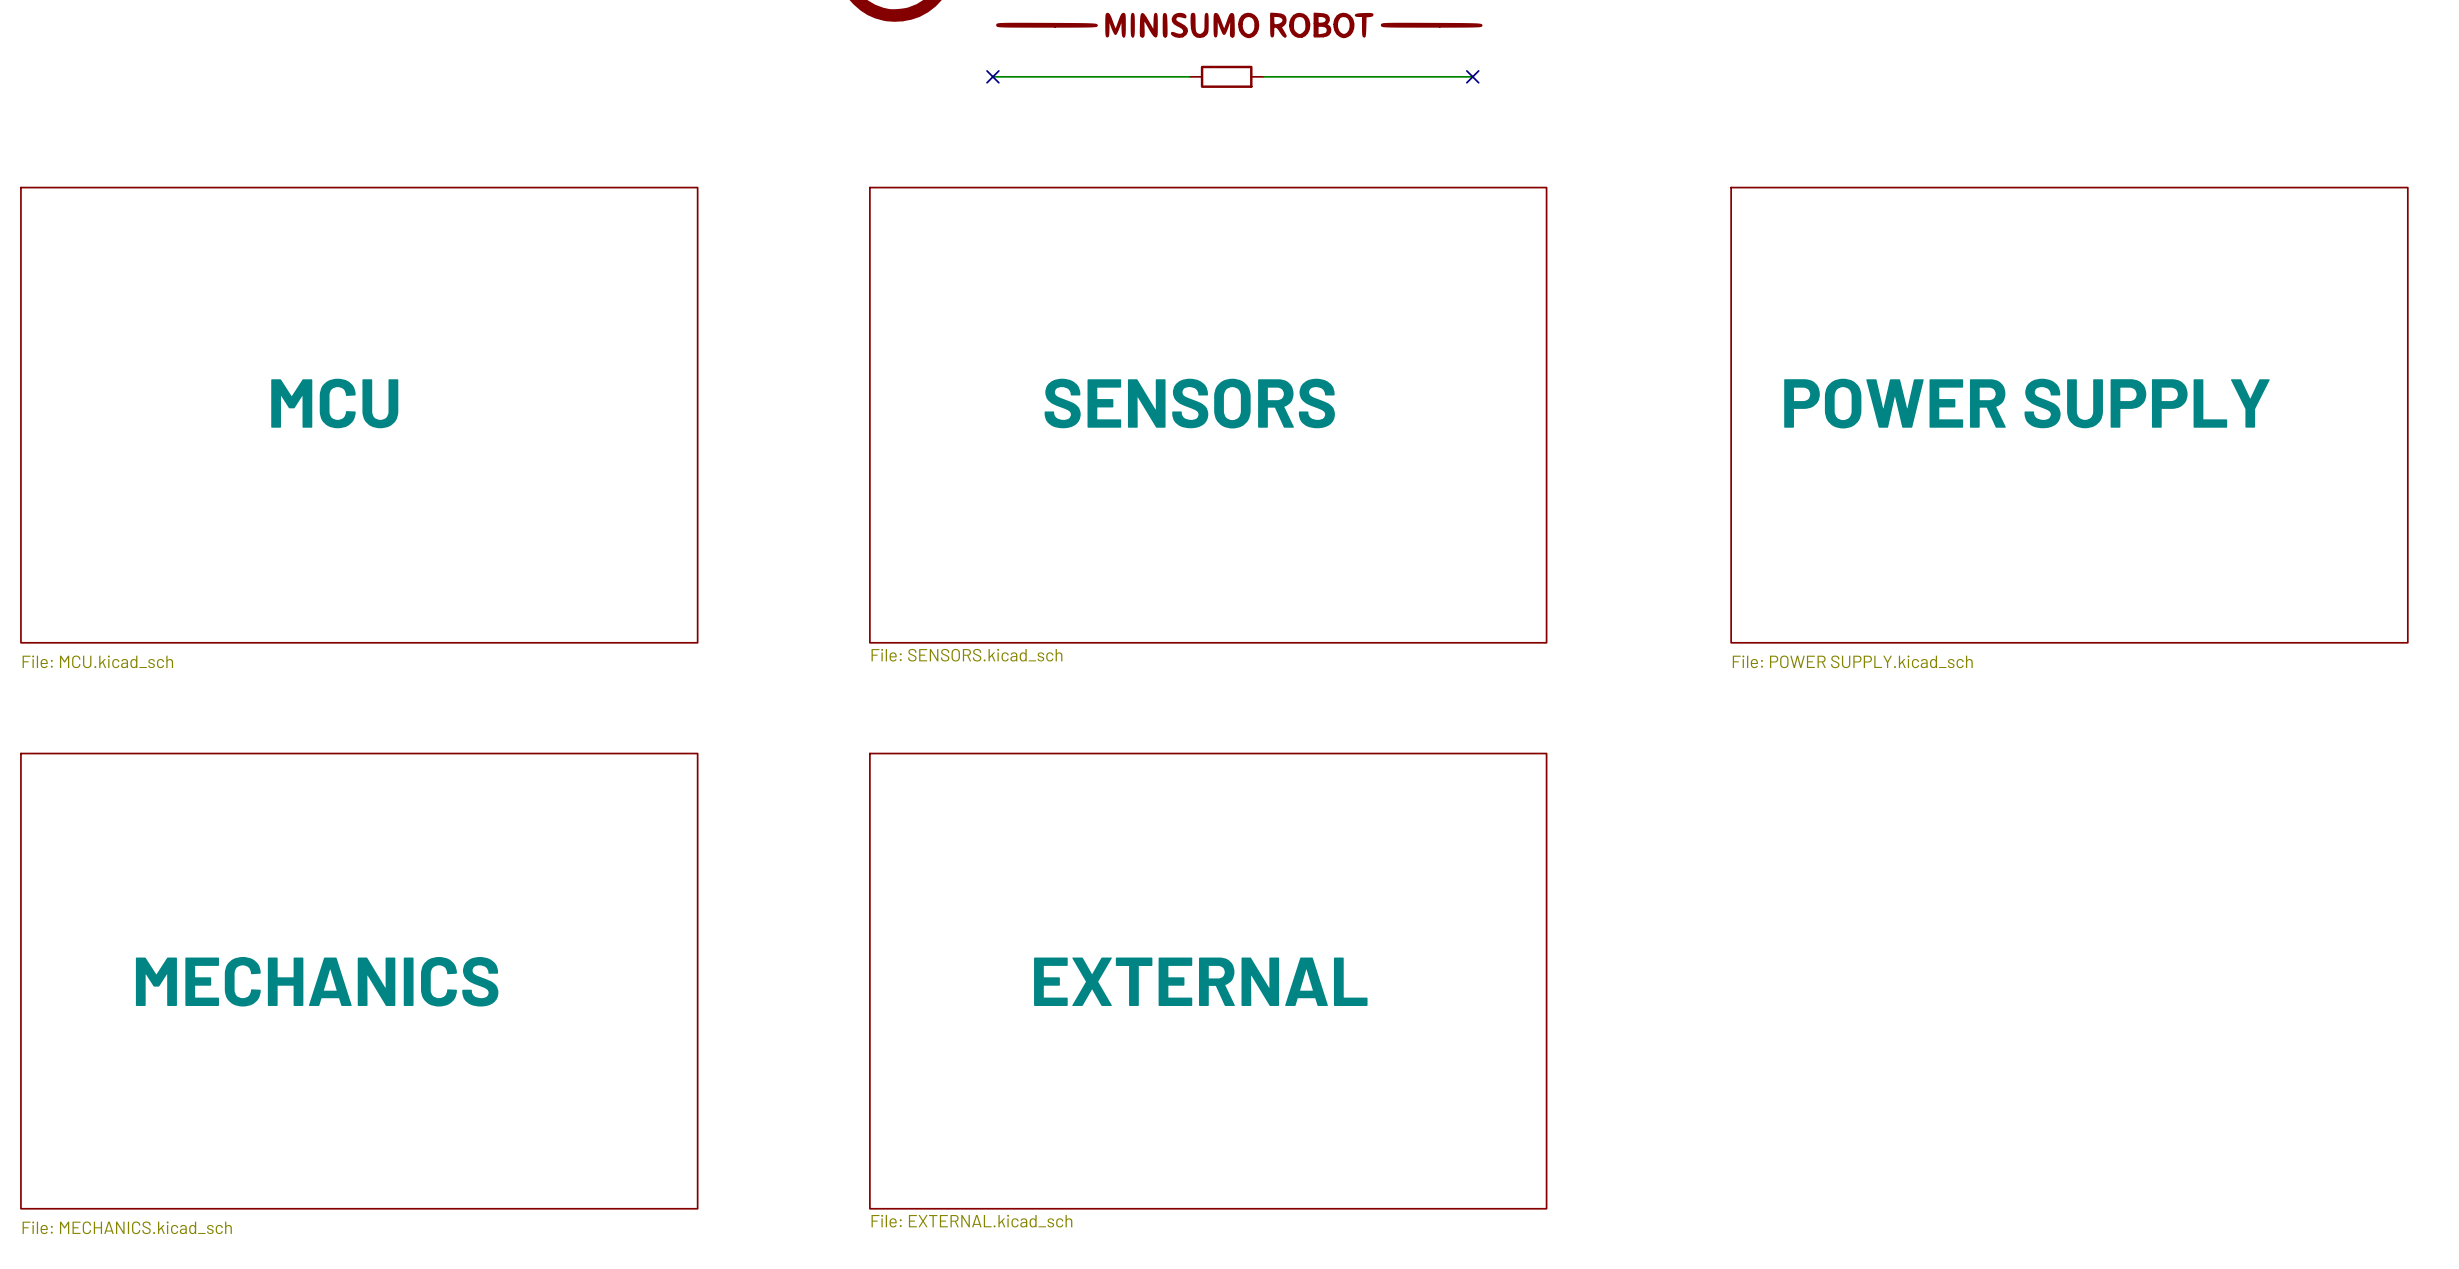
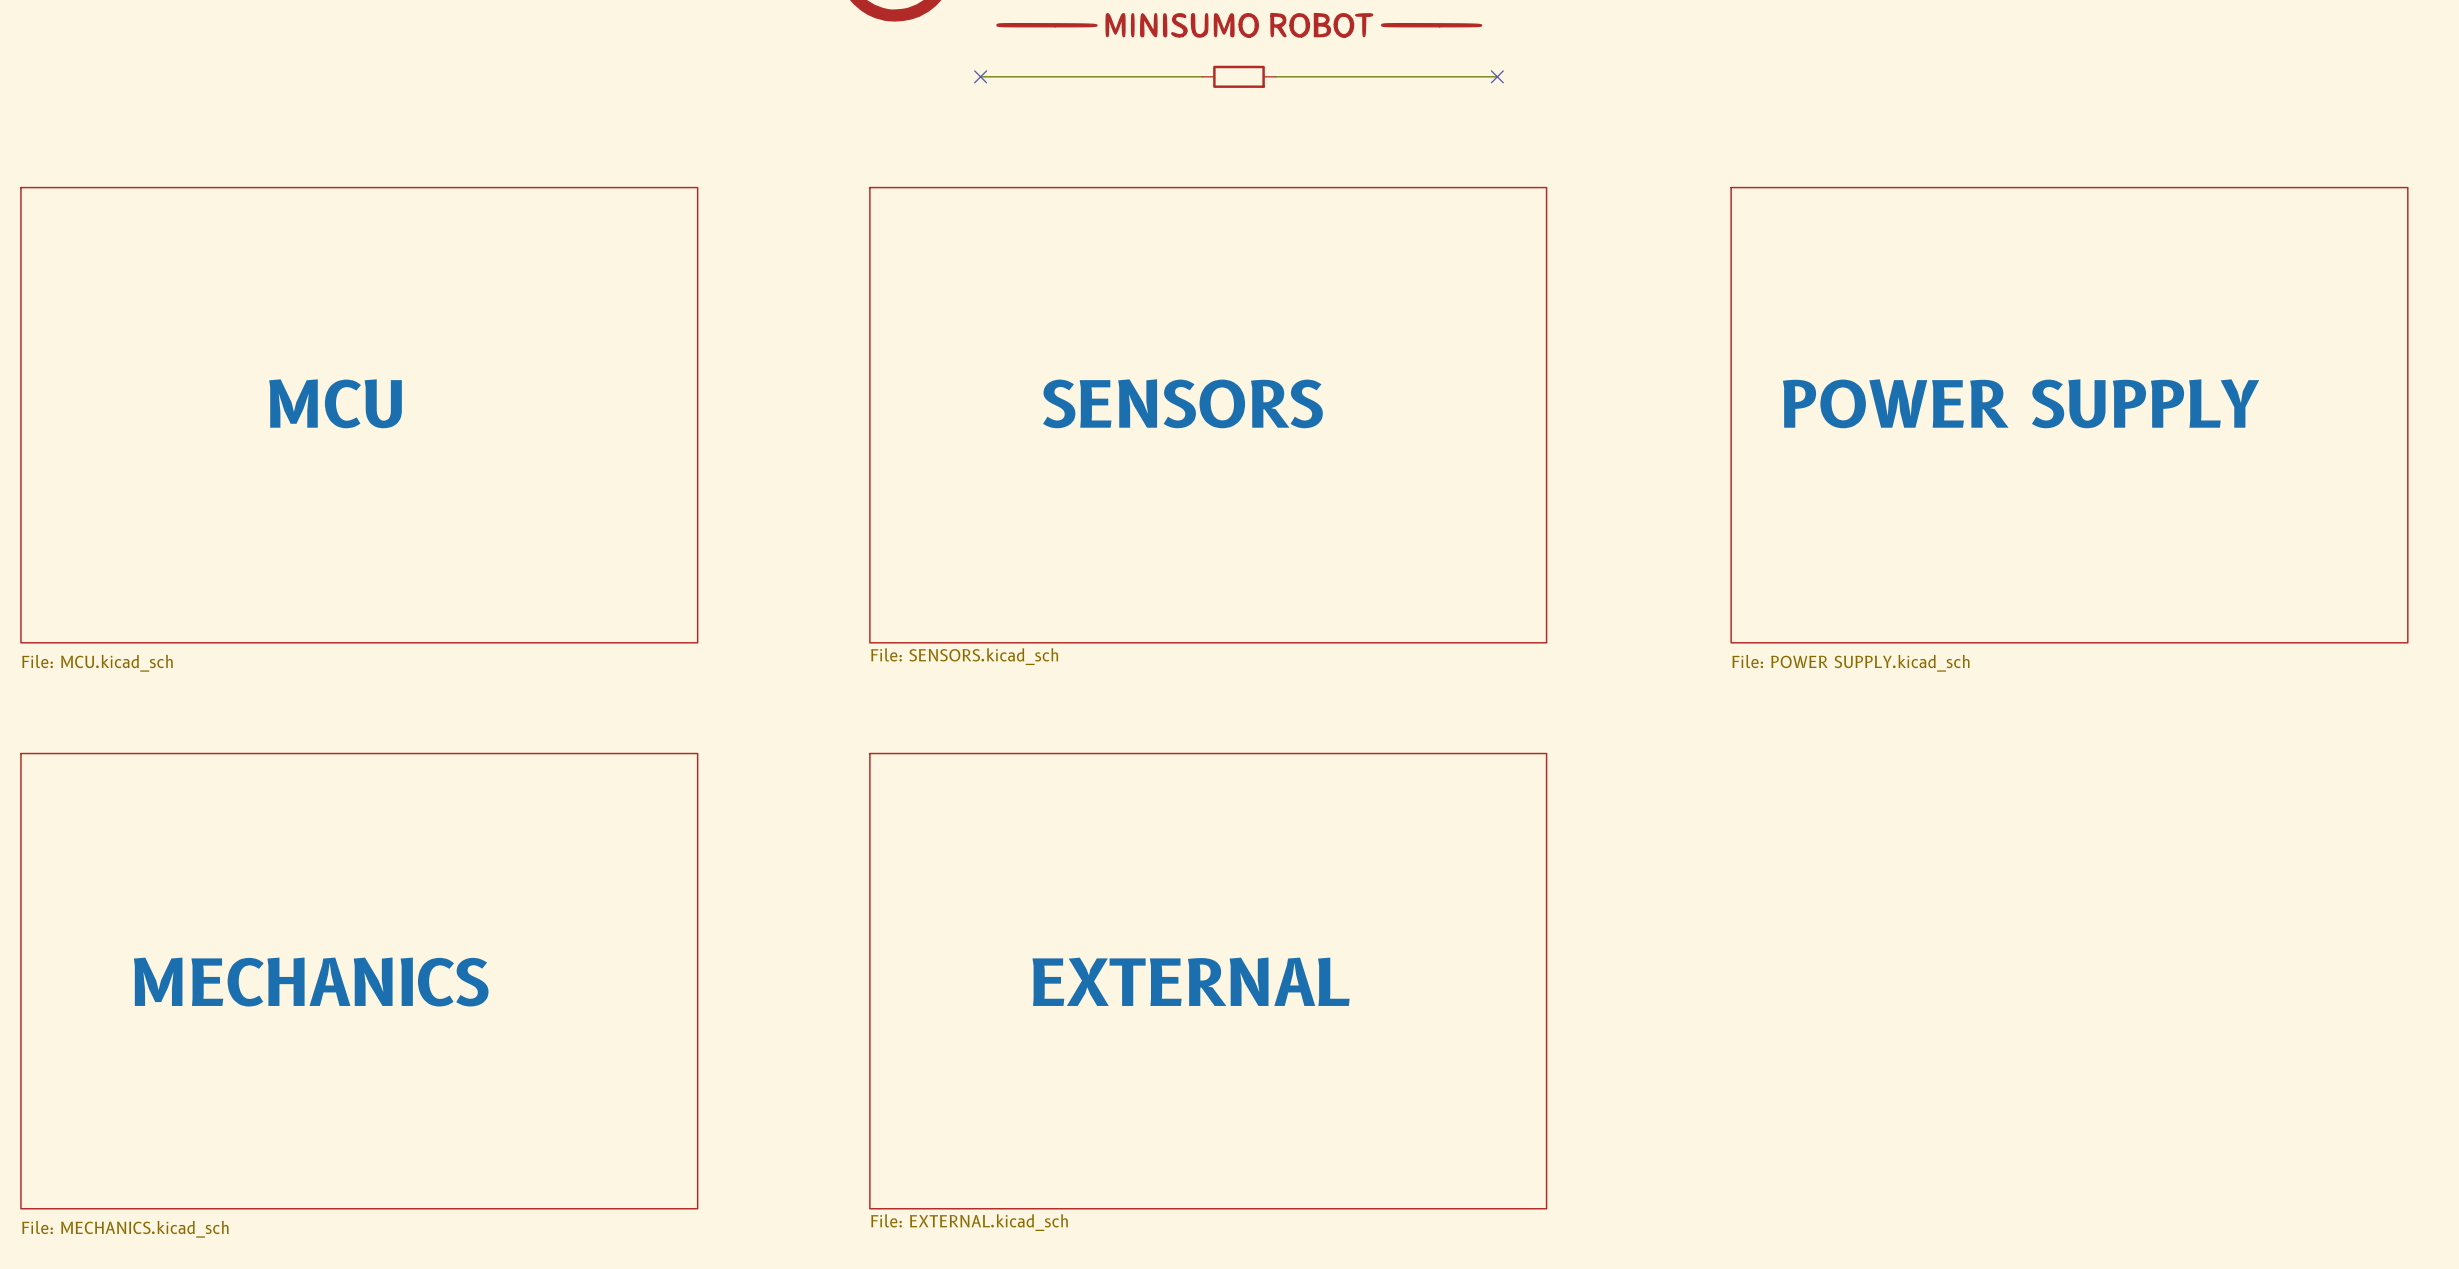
wire: none -> (980, 76) (992, 76)
no-connect mark position: (992, 76) -> (980, 76)
part position: (1226, 76) -> (1238, 76)
wire: none -> (1472, 76) (1497, 76)
no-connect mark position: (1472, 76) -> (1497, 76)

